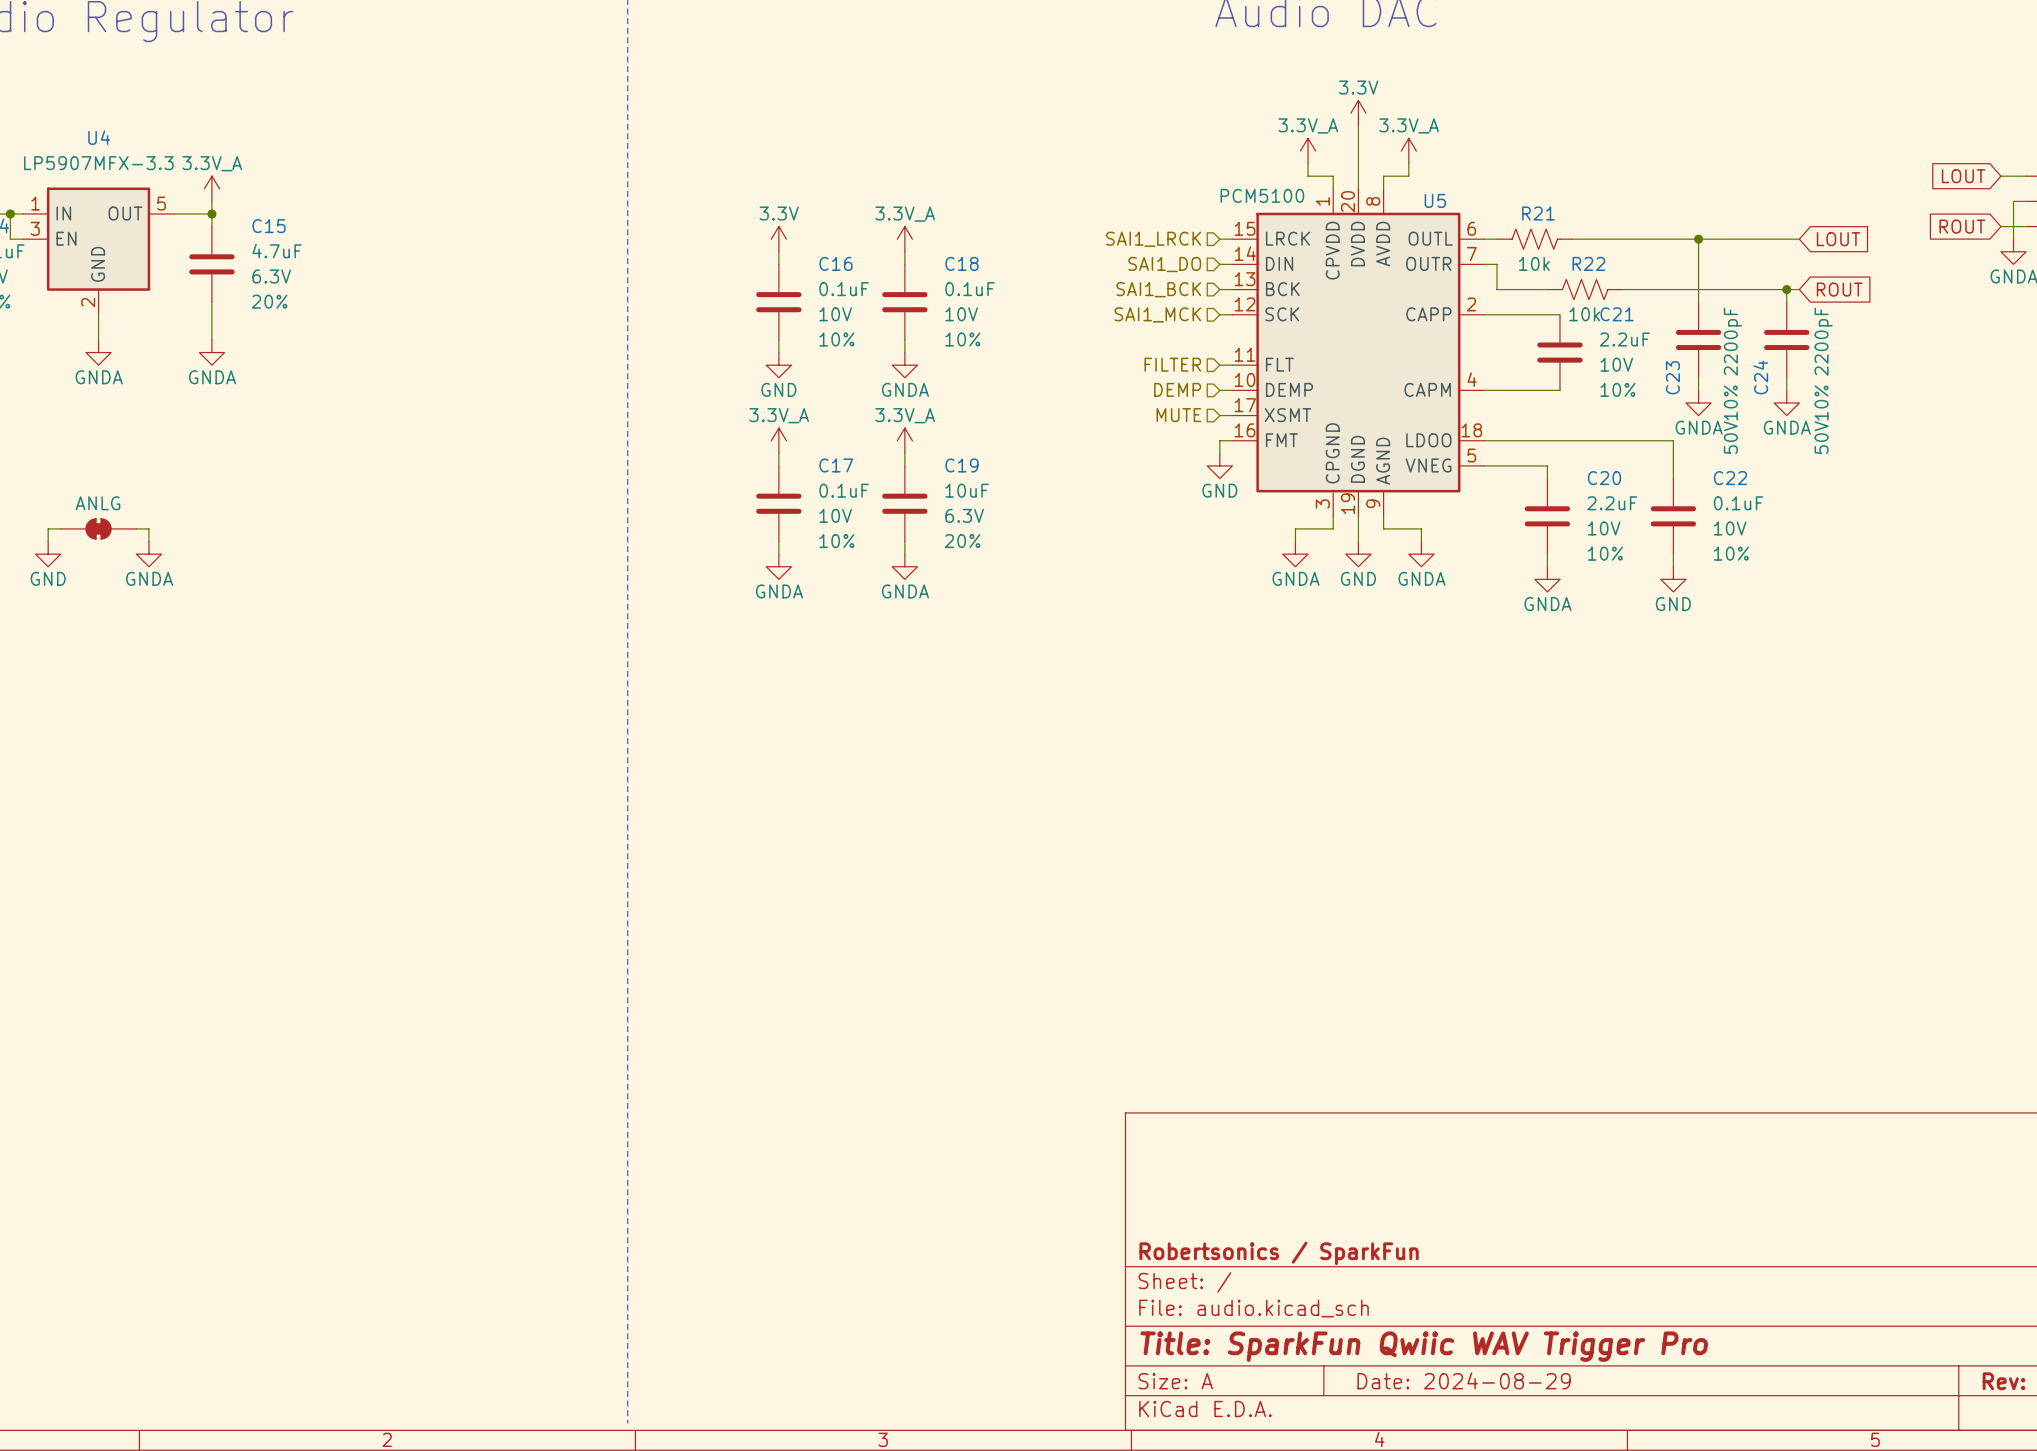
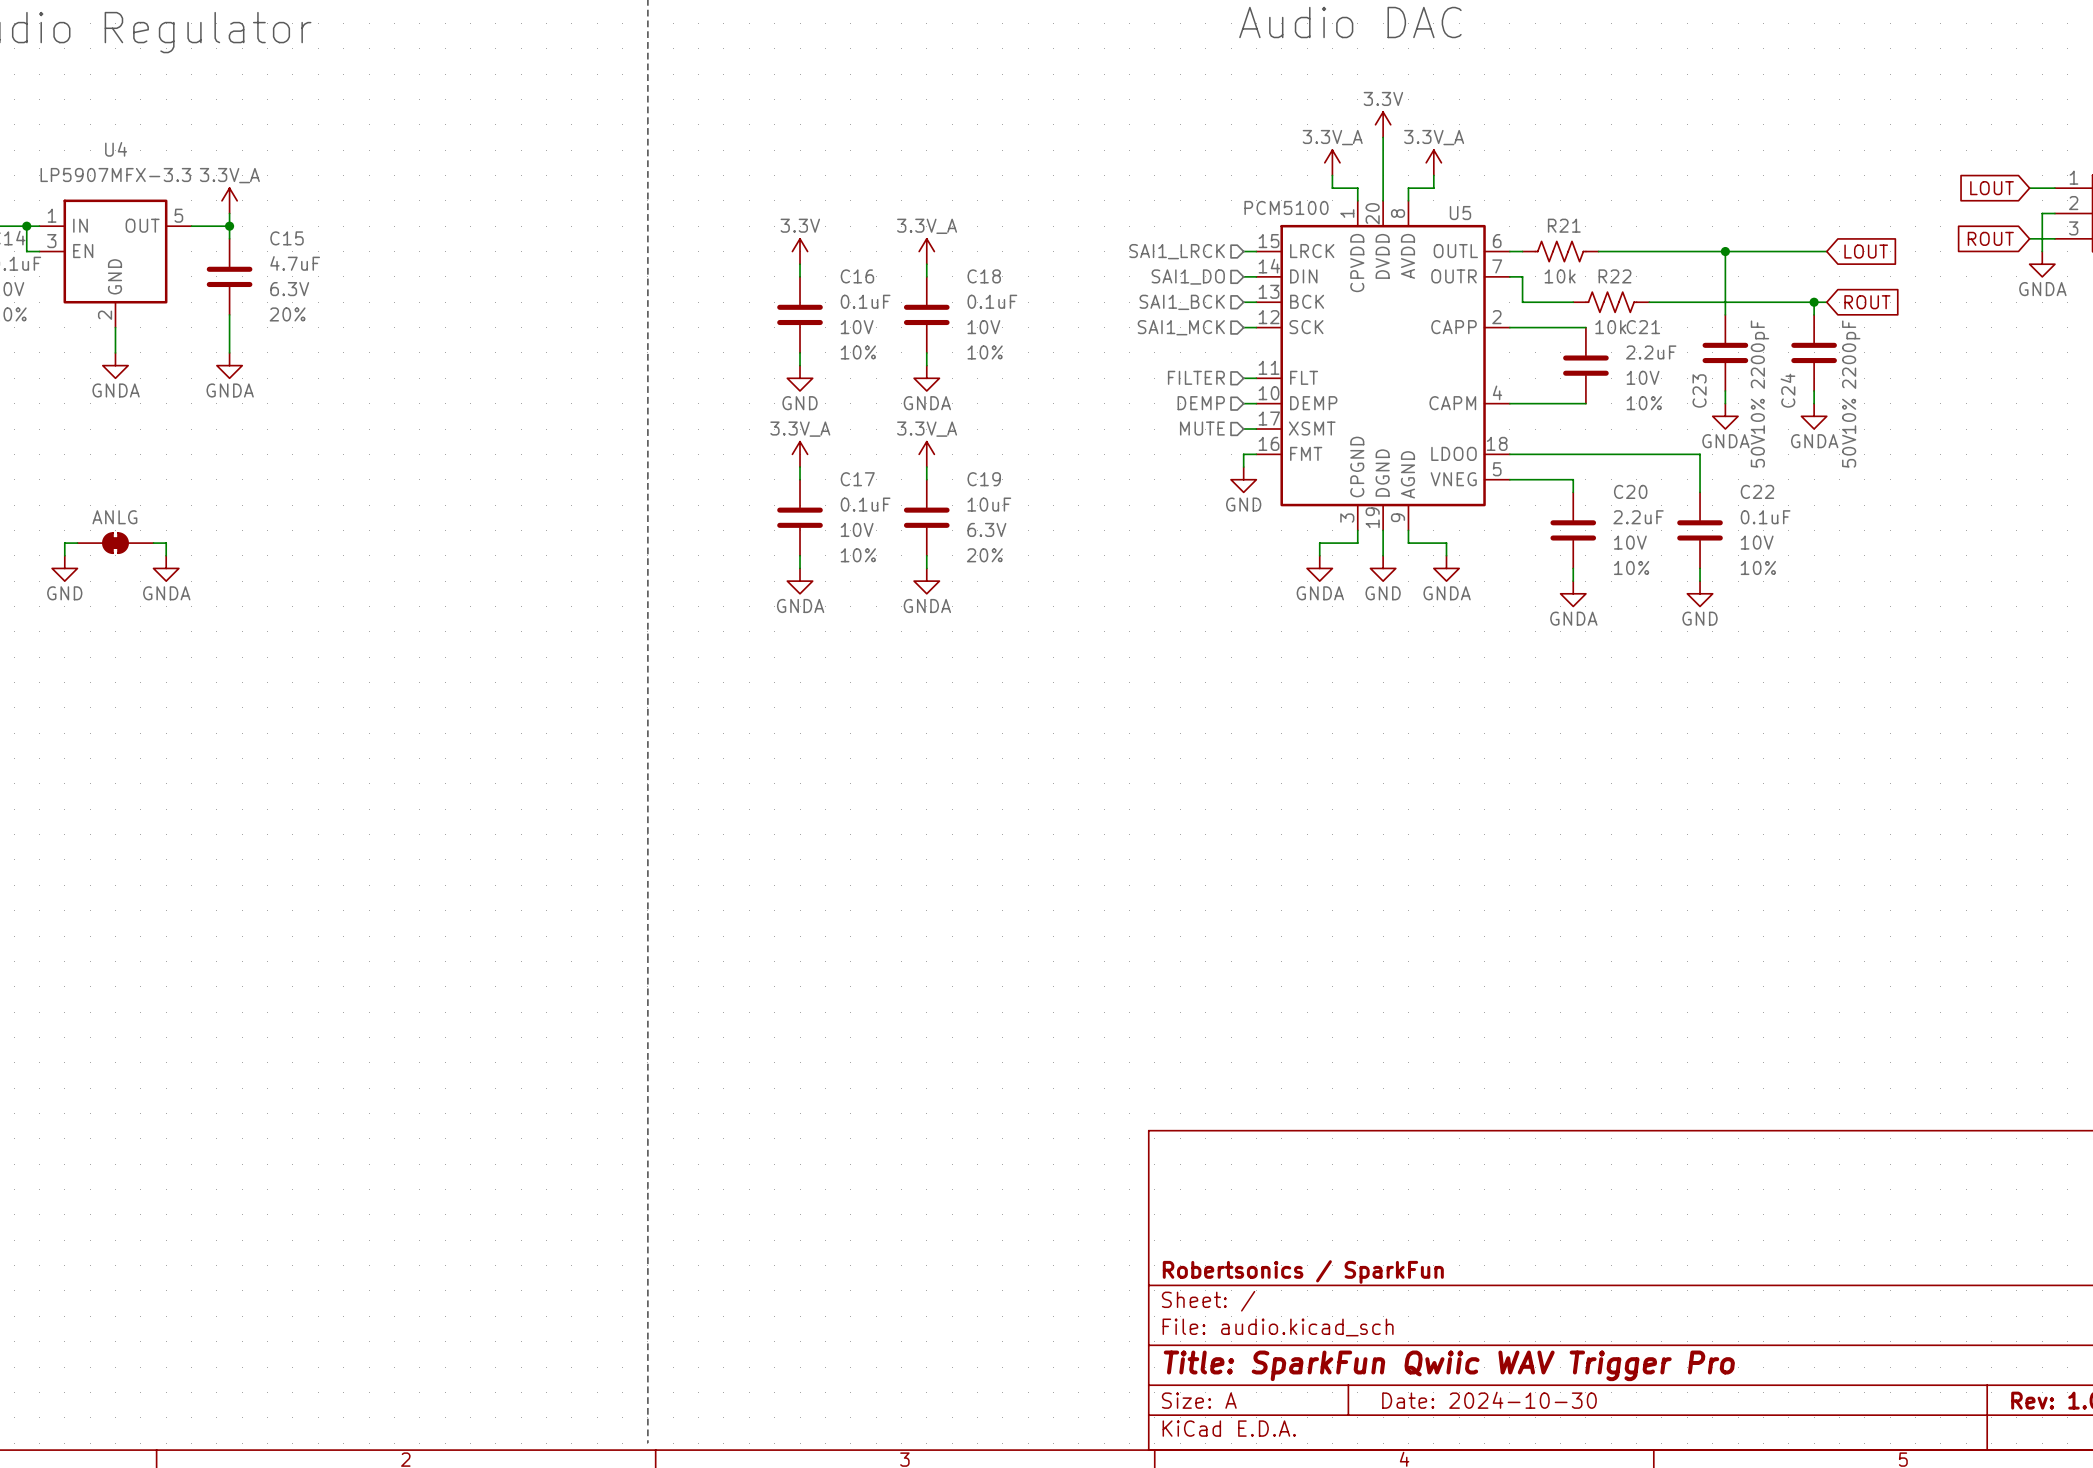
title block: Date: 2024-08-29 (1464, 1380) -> Date: 2024-10-30 (1489, 1400)

